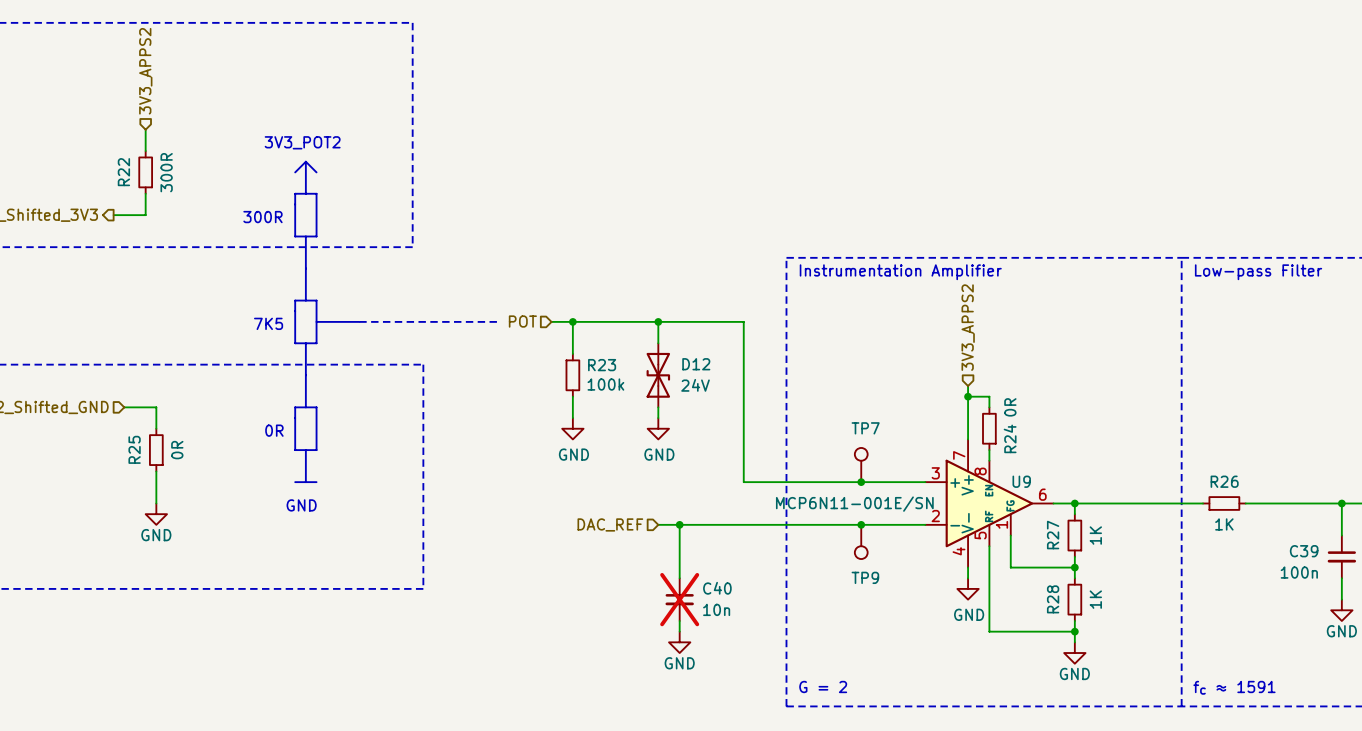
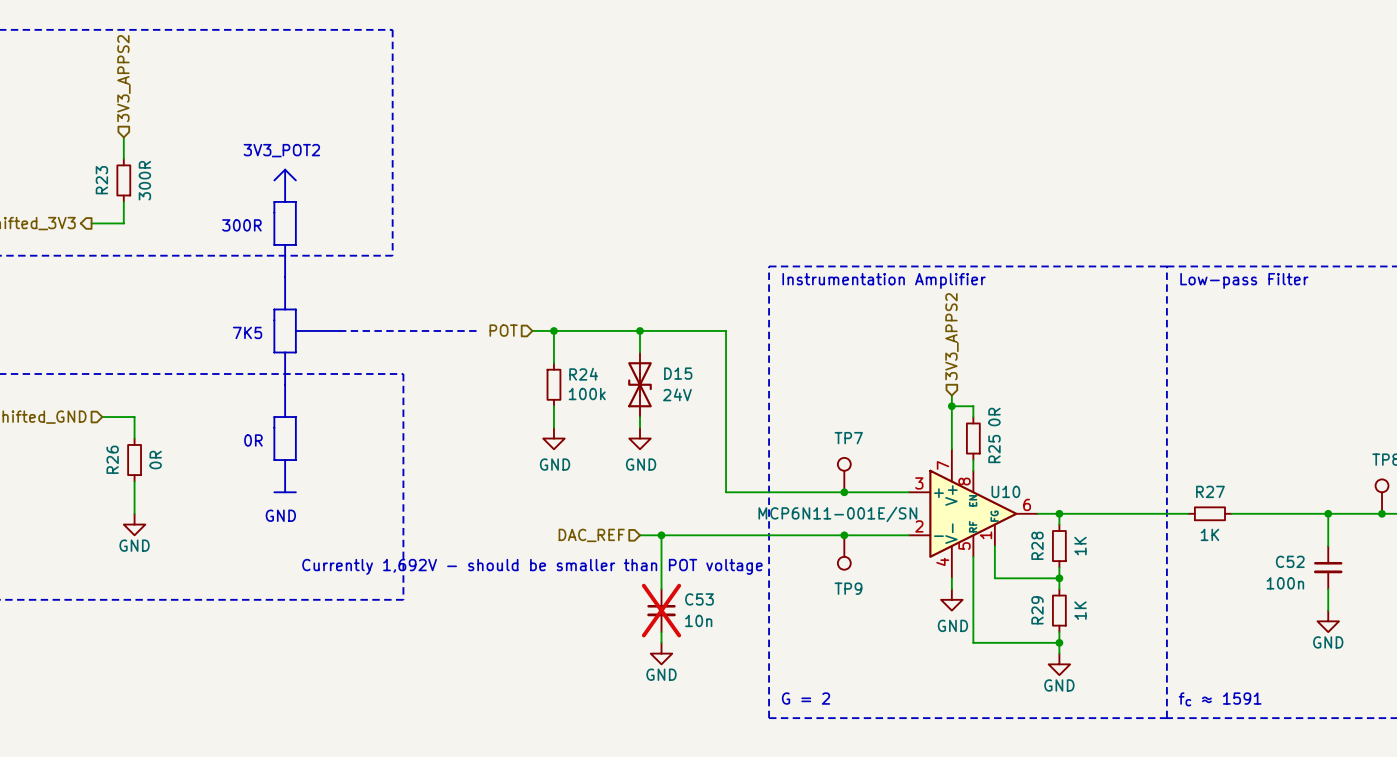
R22 name: R22 (123, 172) -> R23 (101, 180)
D12 name: D12 (696, 364) -> D15 (678, 373)
R23 name: R23 (602, 365) -> R24 (583, 374)
R24 name: R24 (1010, 438) -> R25 (994, 449)
R25 name: R25 (134, 449) -> R26 (112, 459)
U9 name: U9 (1021, 481) -> U10 (1005, 491)
R26 name: R26 (1224, 481) -> R27 (1210, 491)
R27 name: R27 (1053, 535) -> R28 (1037, 545)
C39 name: C39 (1304, 551) -> C52 (1290, 561)
text: none -> Currently 1,692V - should be smaller than POT voltage (532, 566)
C40 name: C40 (717, 588) -> C53 (699, 599)
R28 name: R28 (1053, 599) -> R29 (1037, 610)

